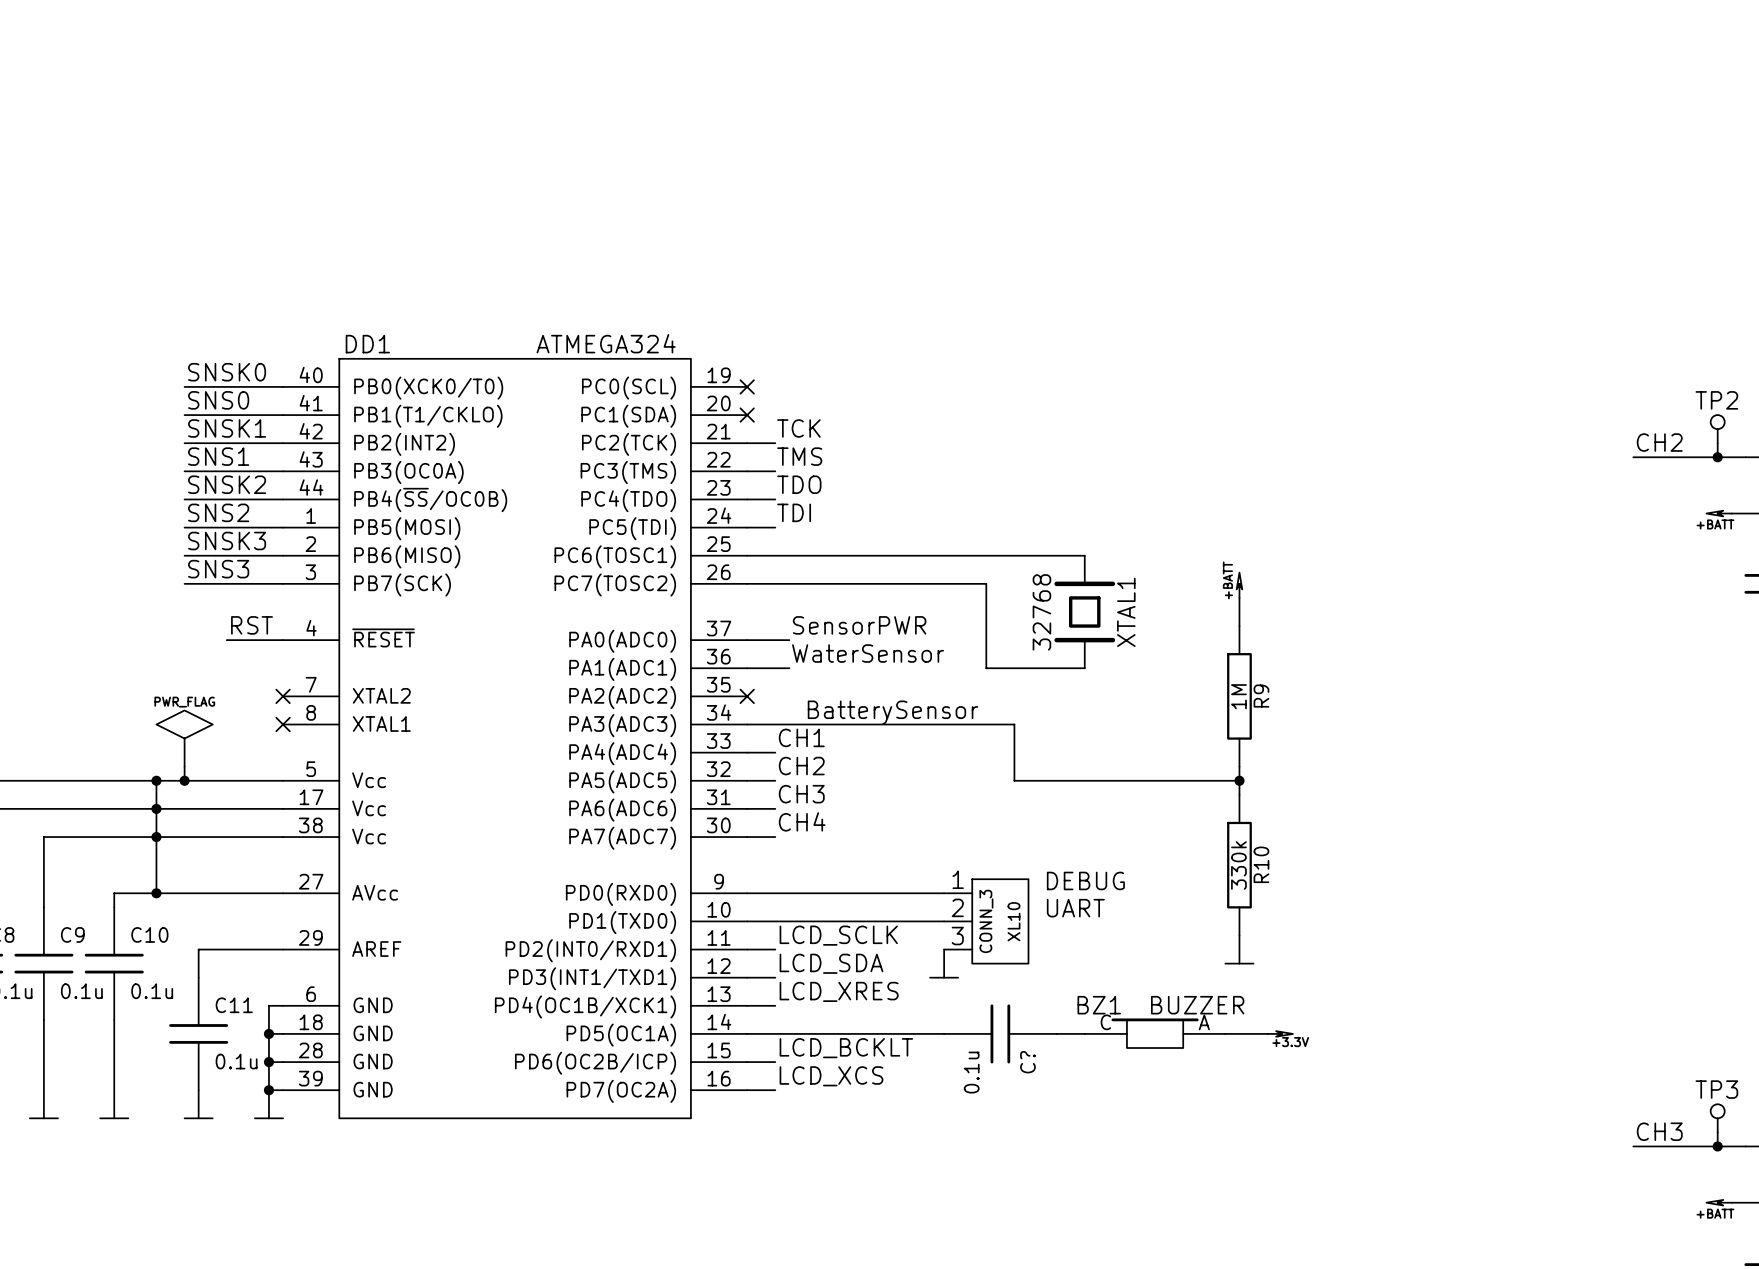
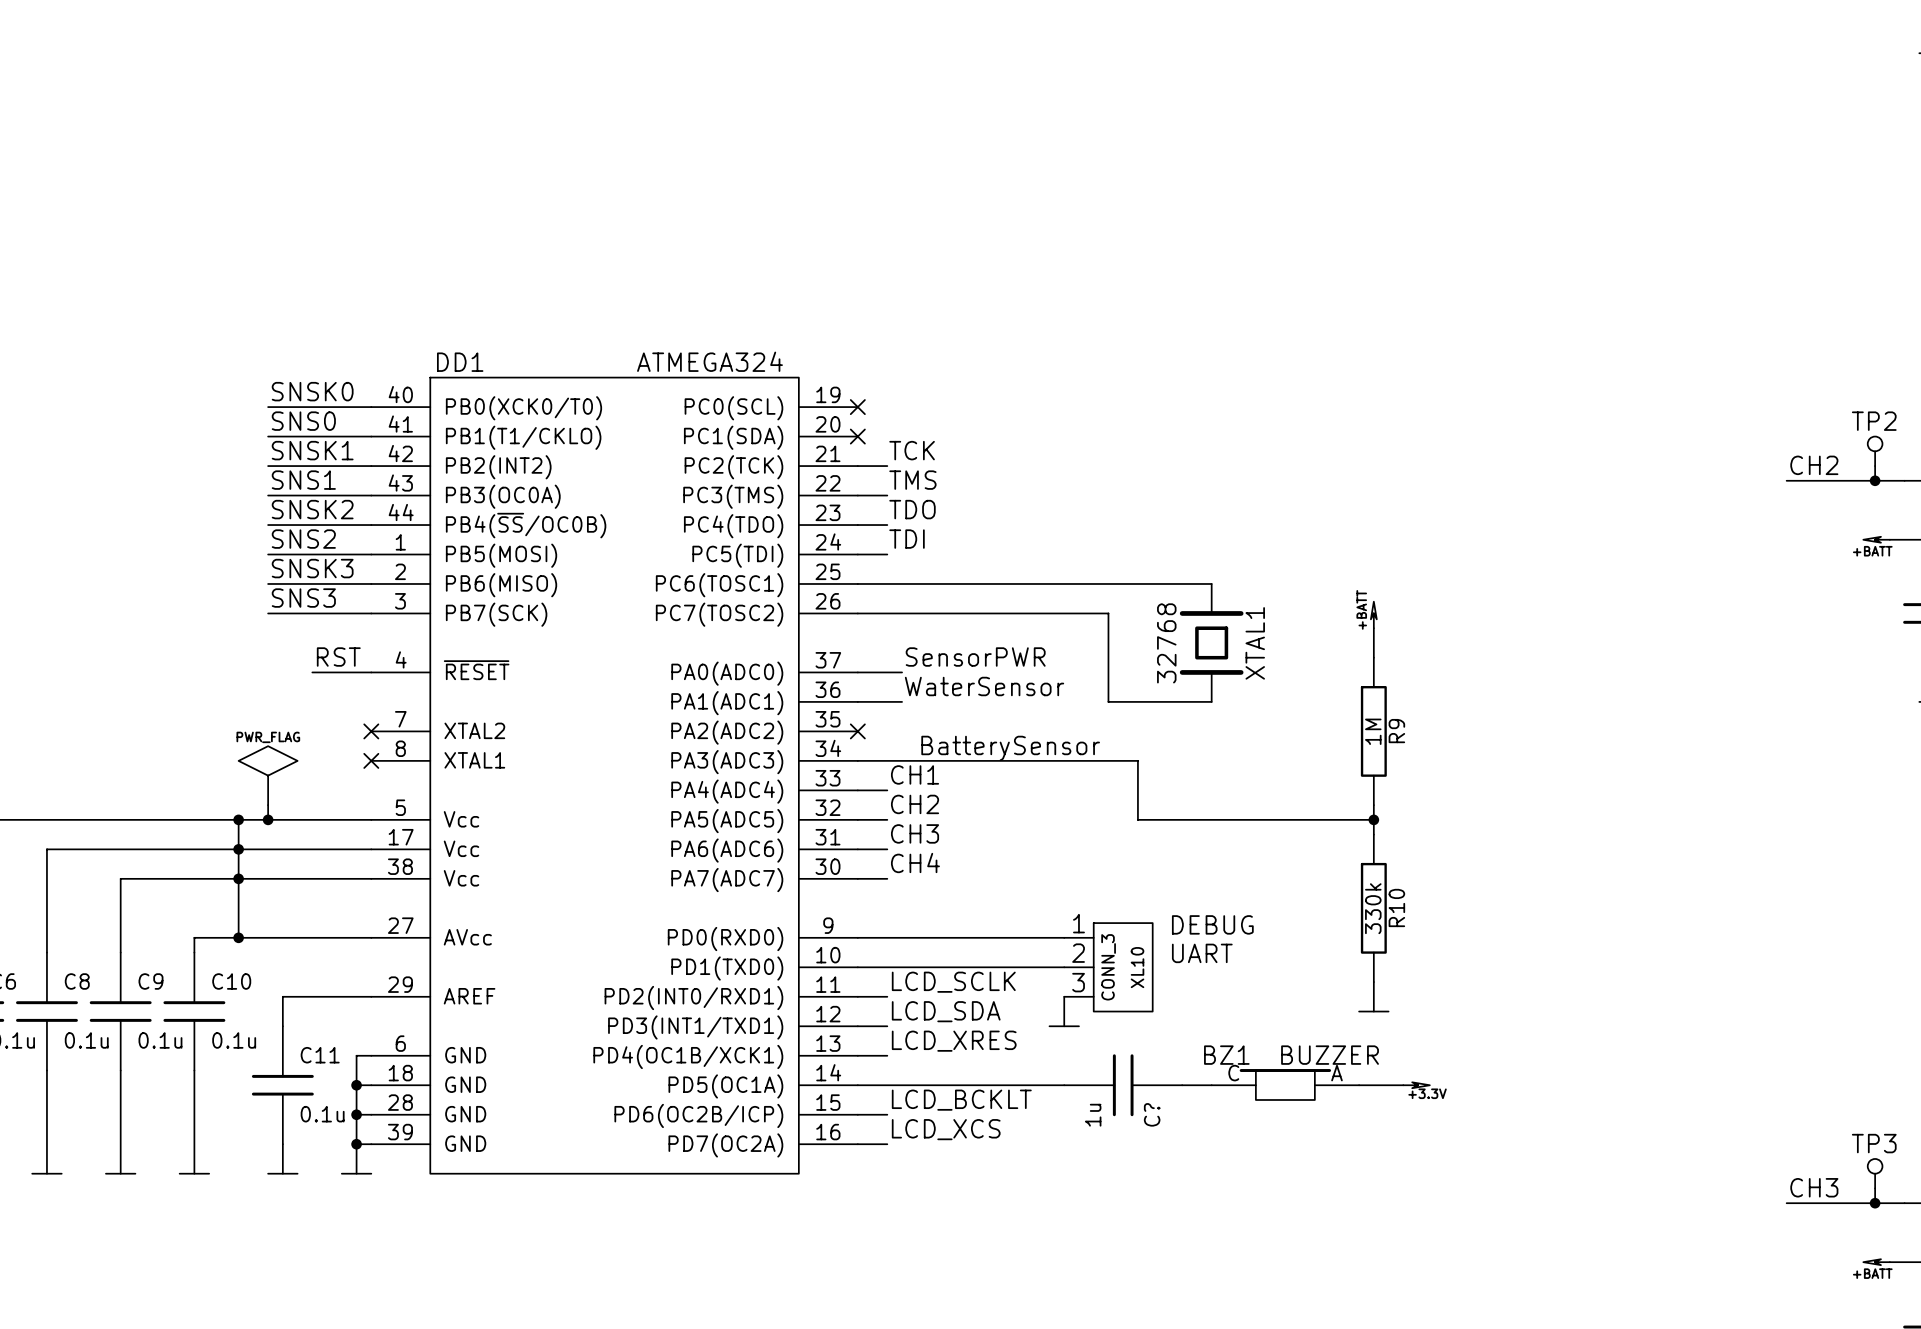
C? value: 0.1u (971, 1072) -> 1u (1093, 1115)

